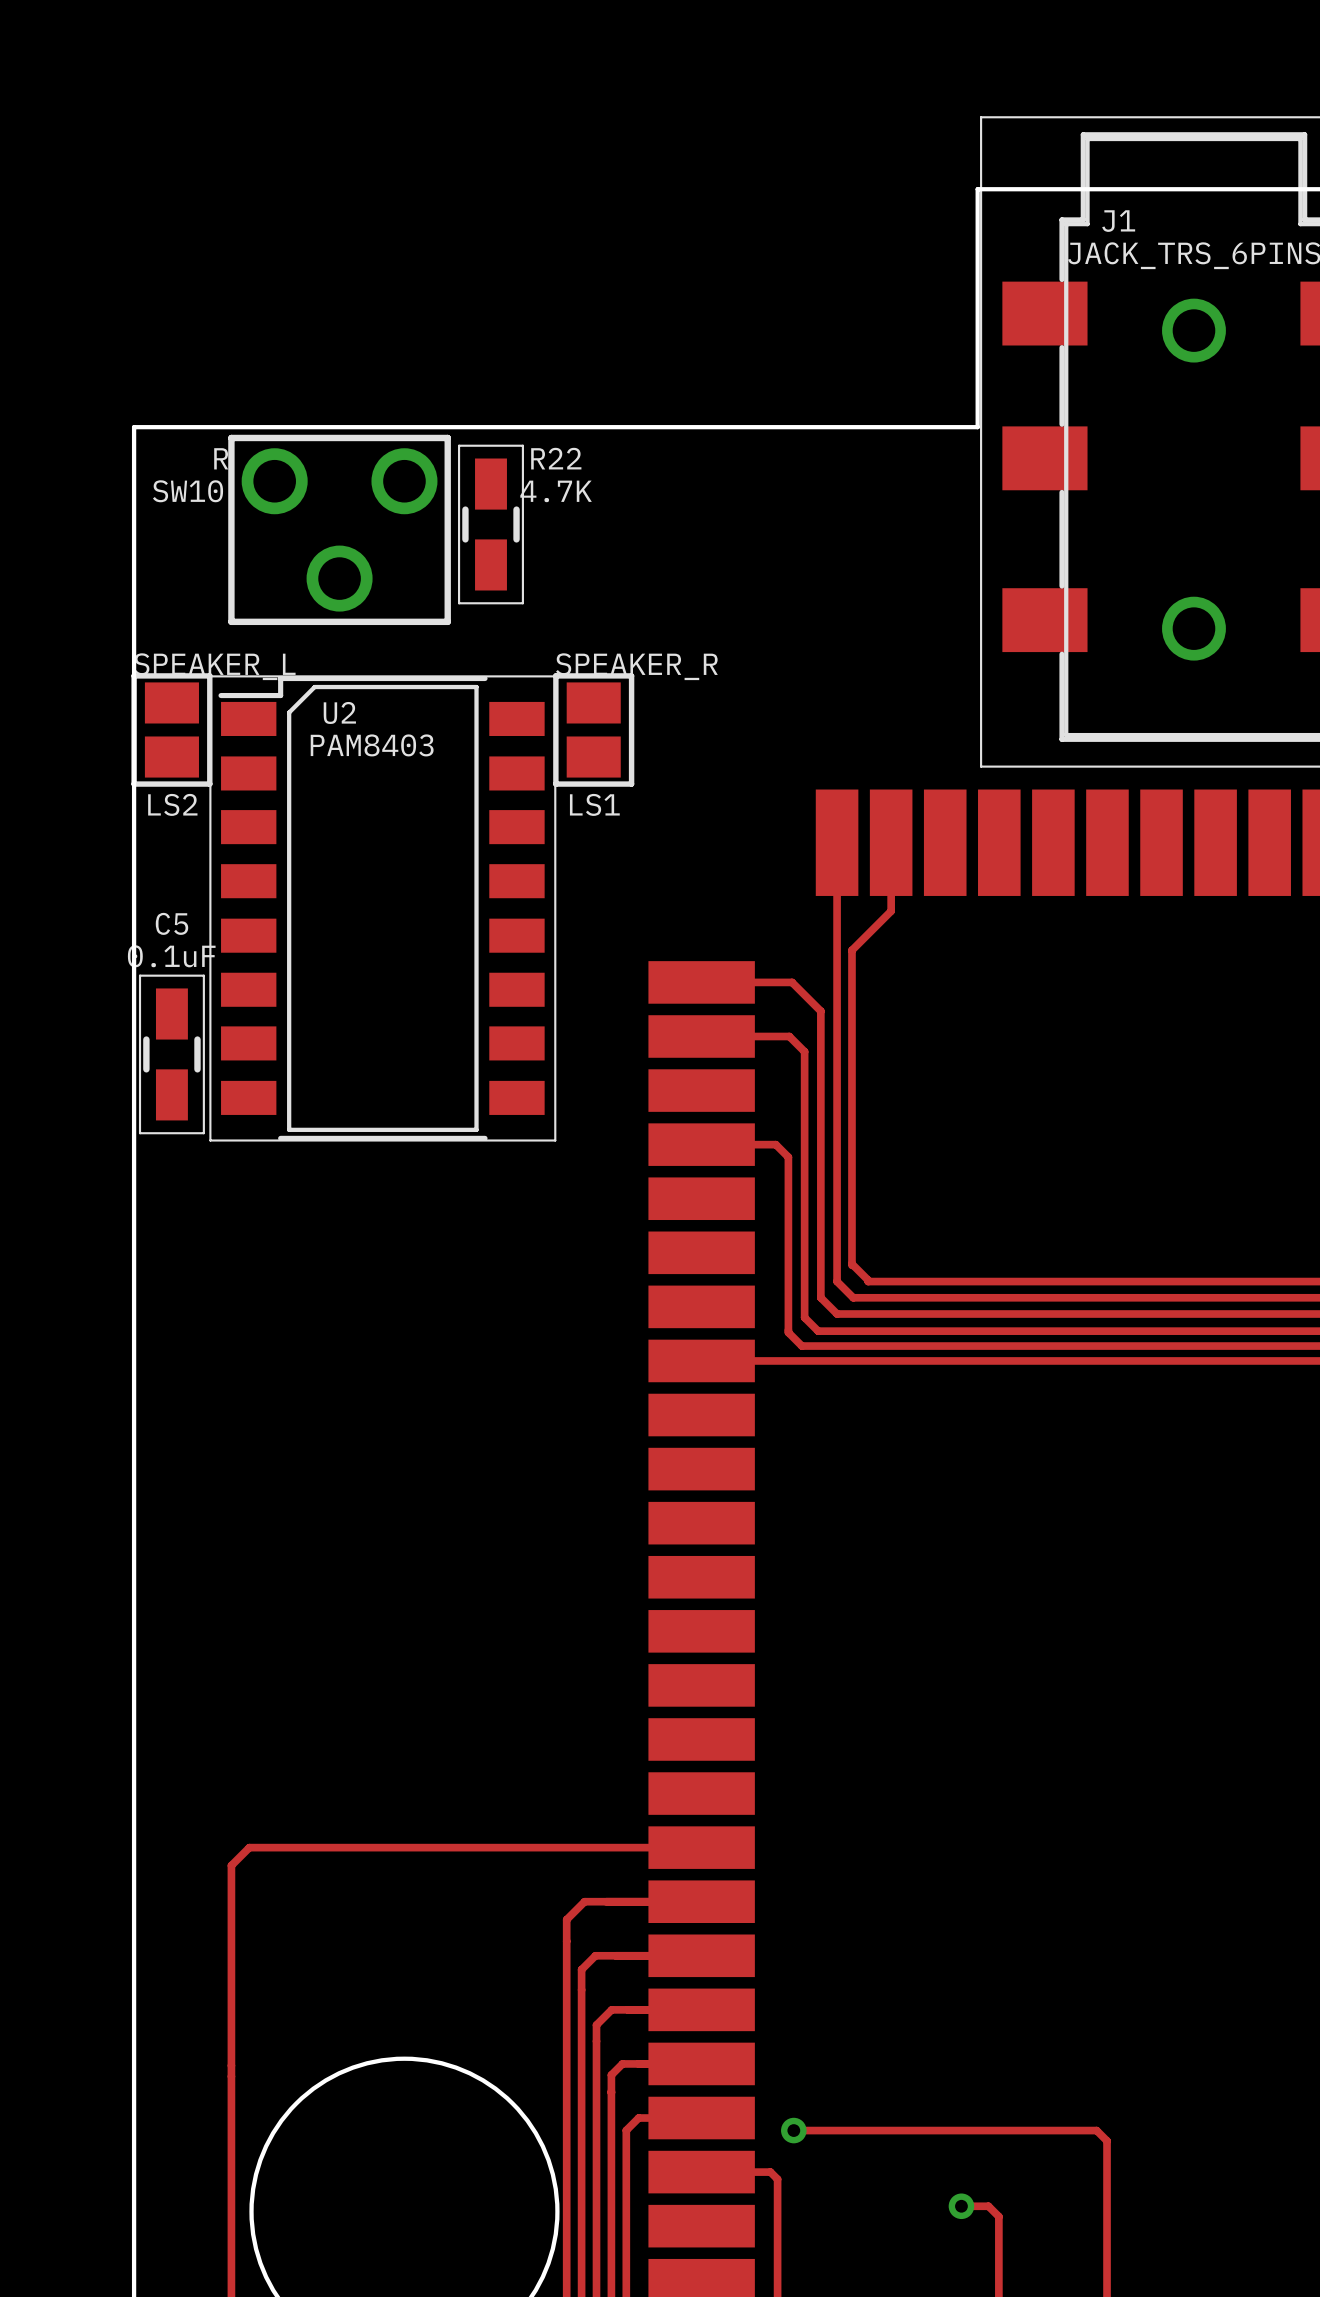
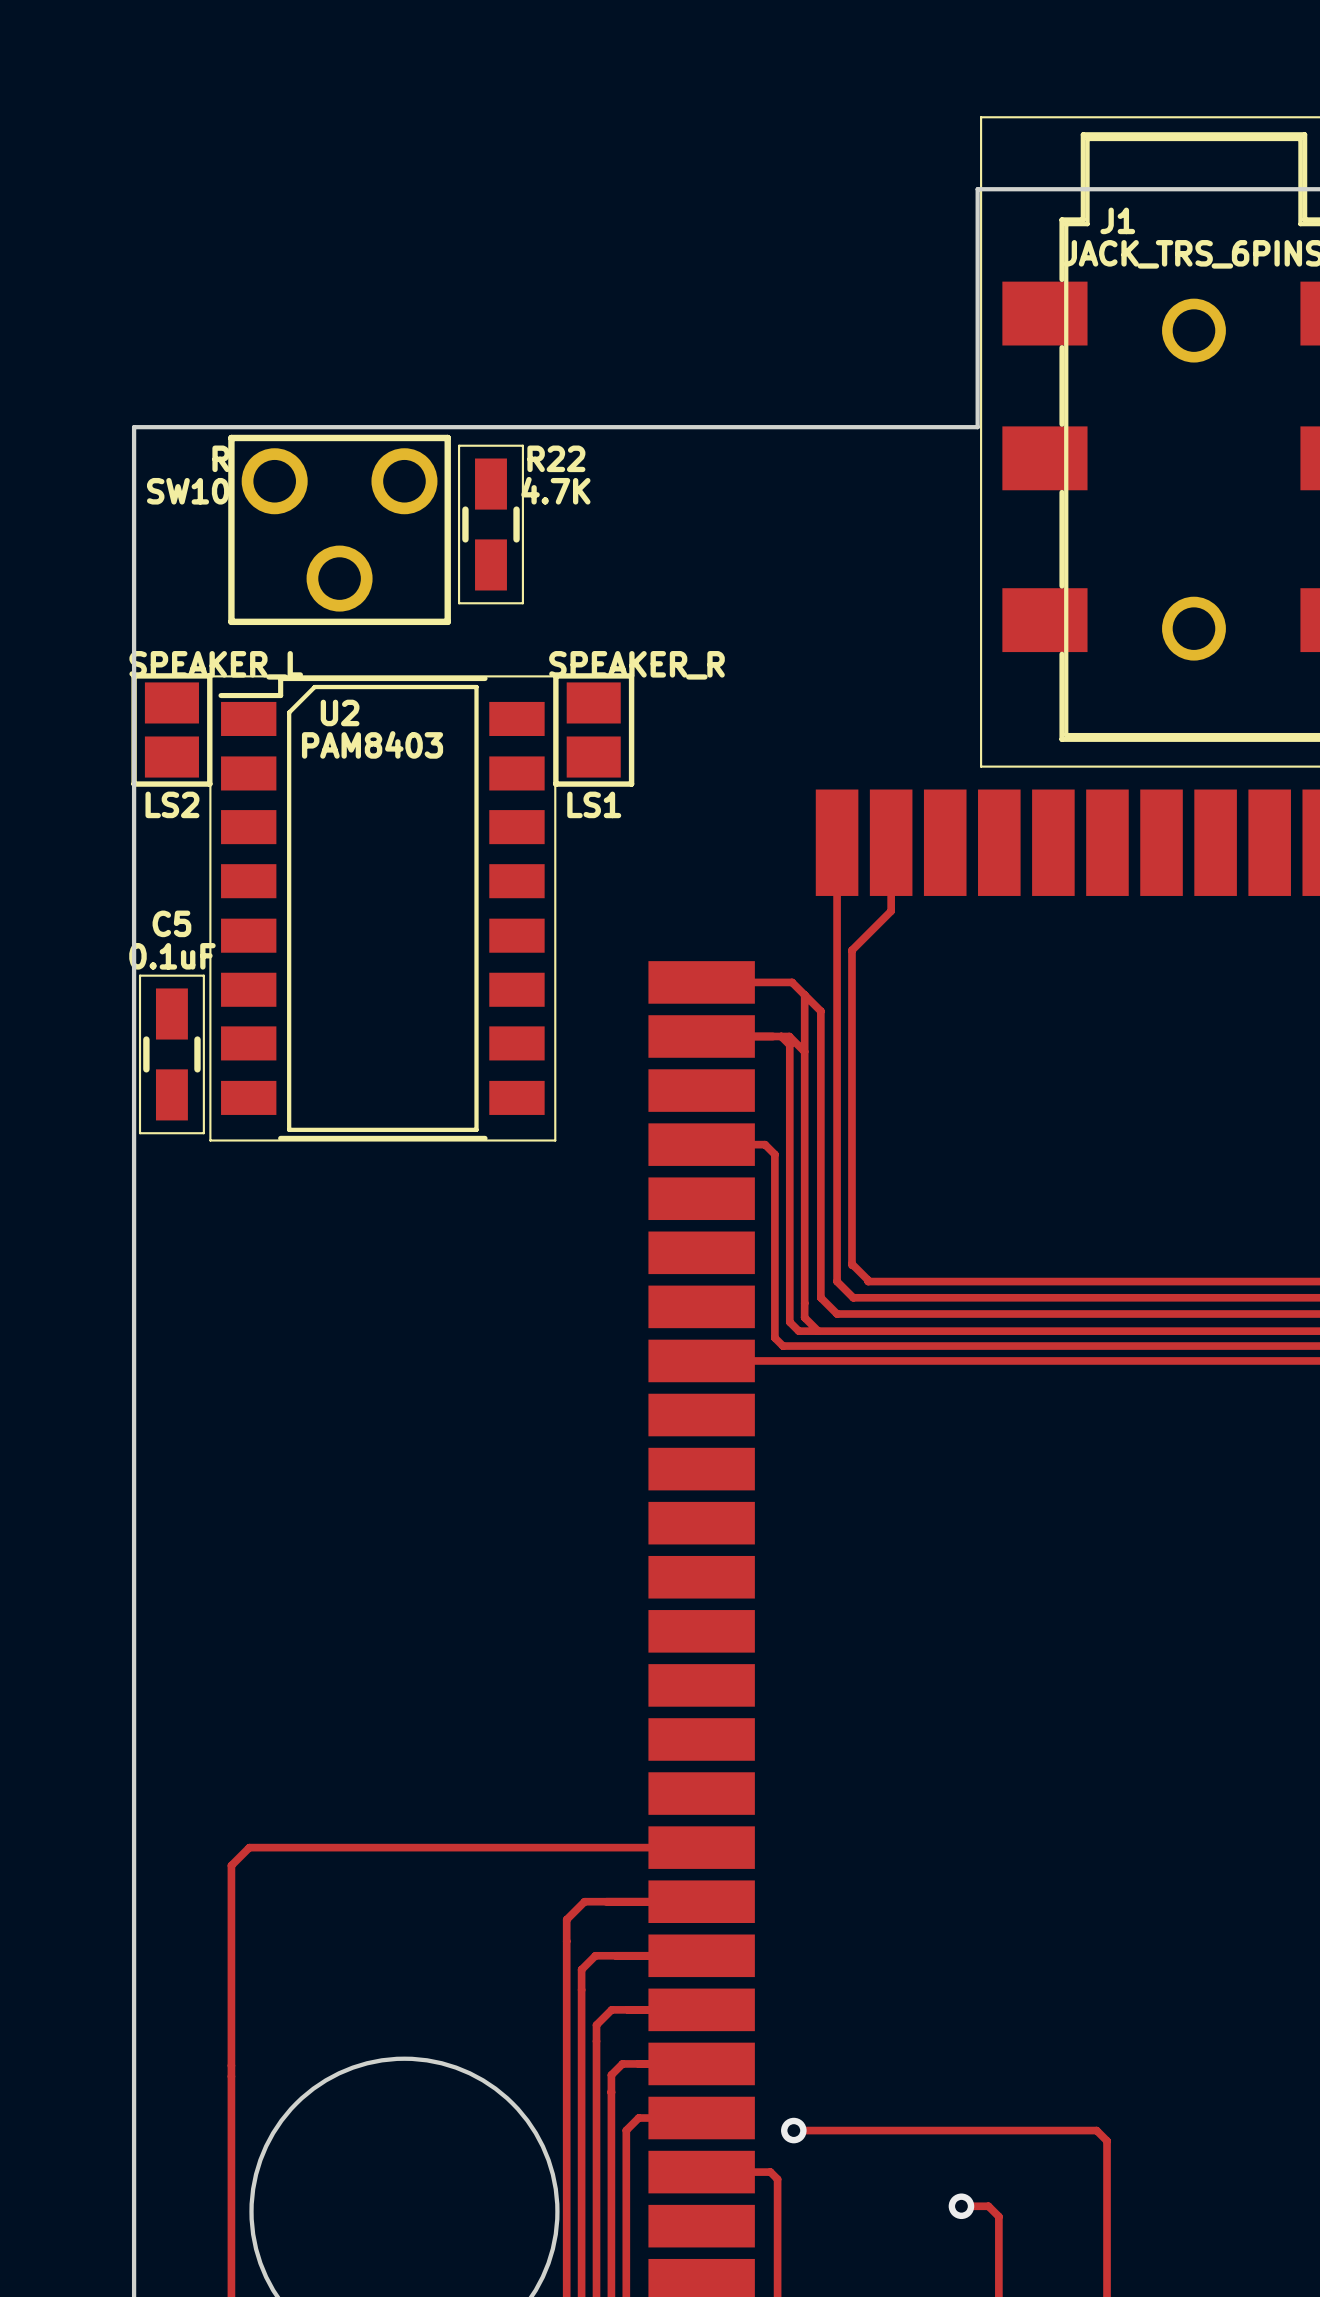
track: none -> (781, 1036) (789, 1045) (789, 1322) (798, 1331) (818, 1331)
track: (765, 1144) (775, 1144) (788, 1157) (788, 1332) (801, 1346) -> (765, 1144) (774, 1154) (774, 1337) (783, 1346) (801, 1346)

